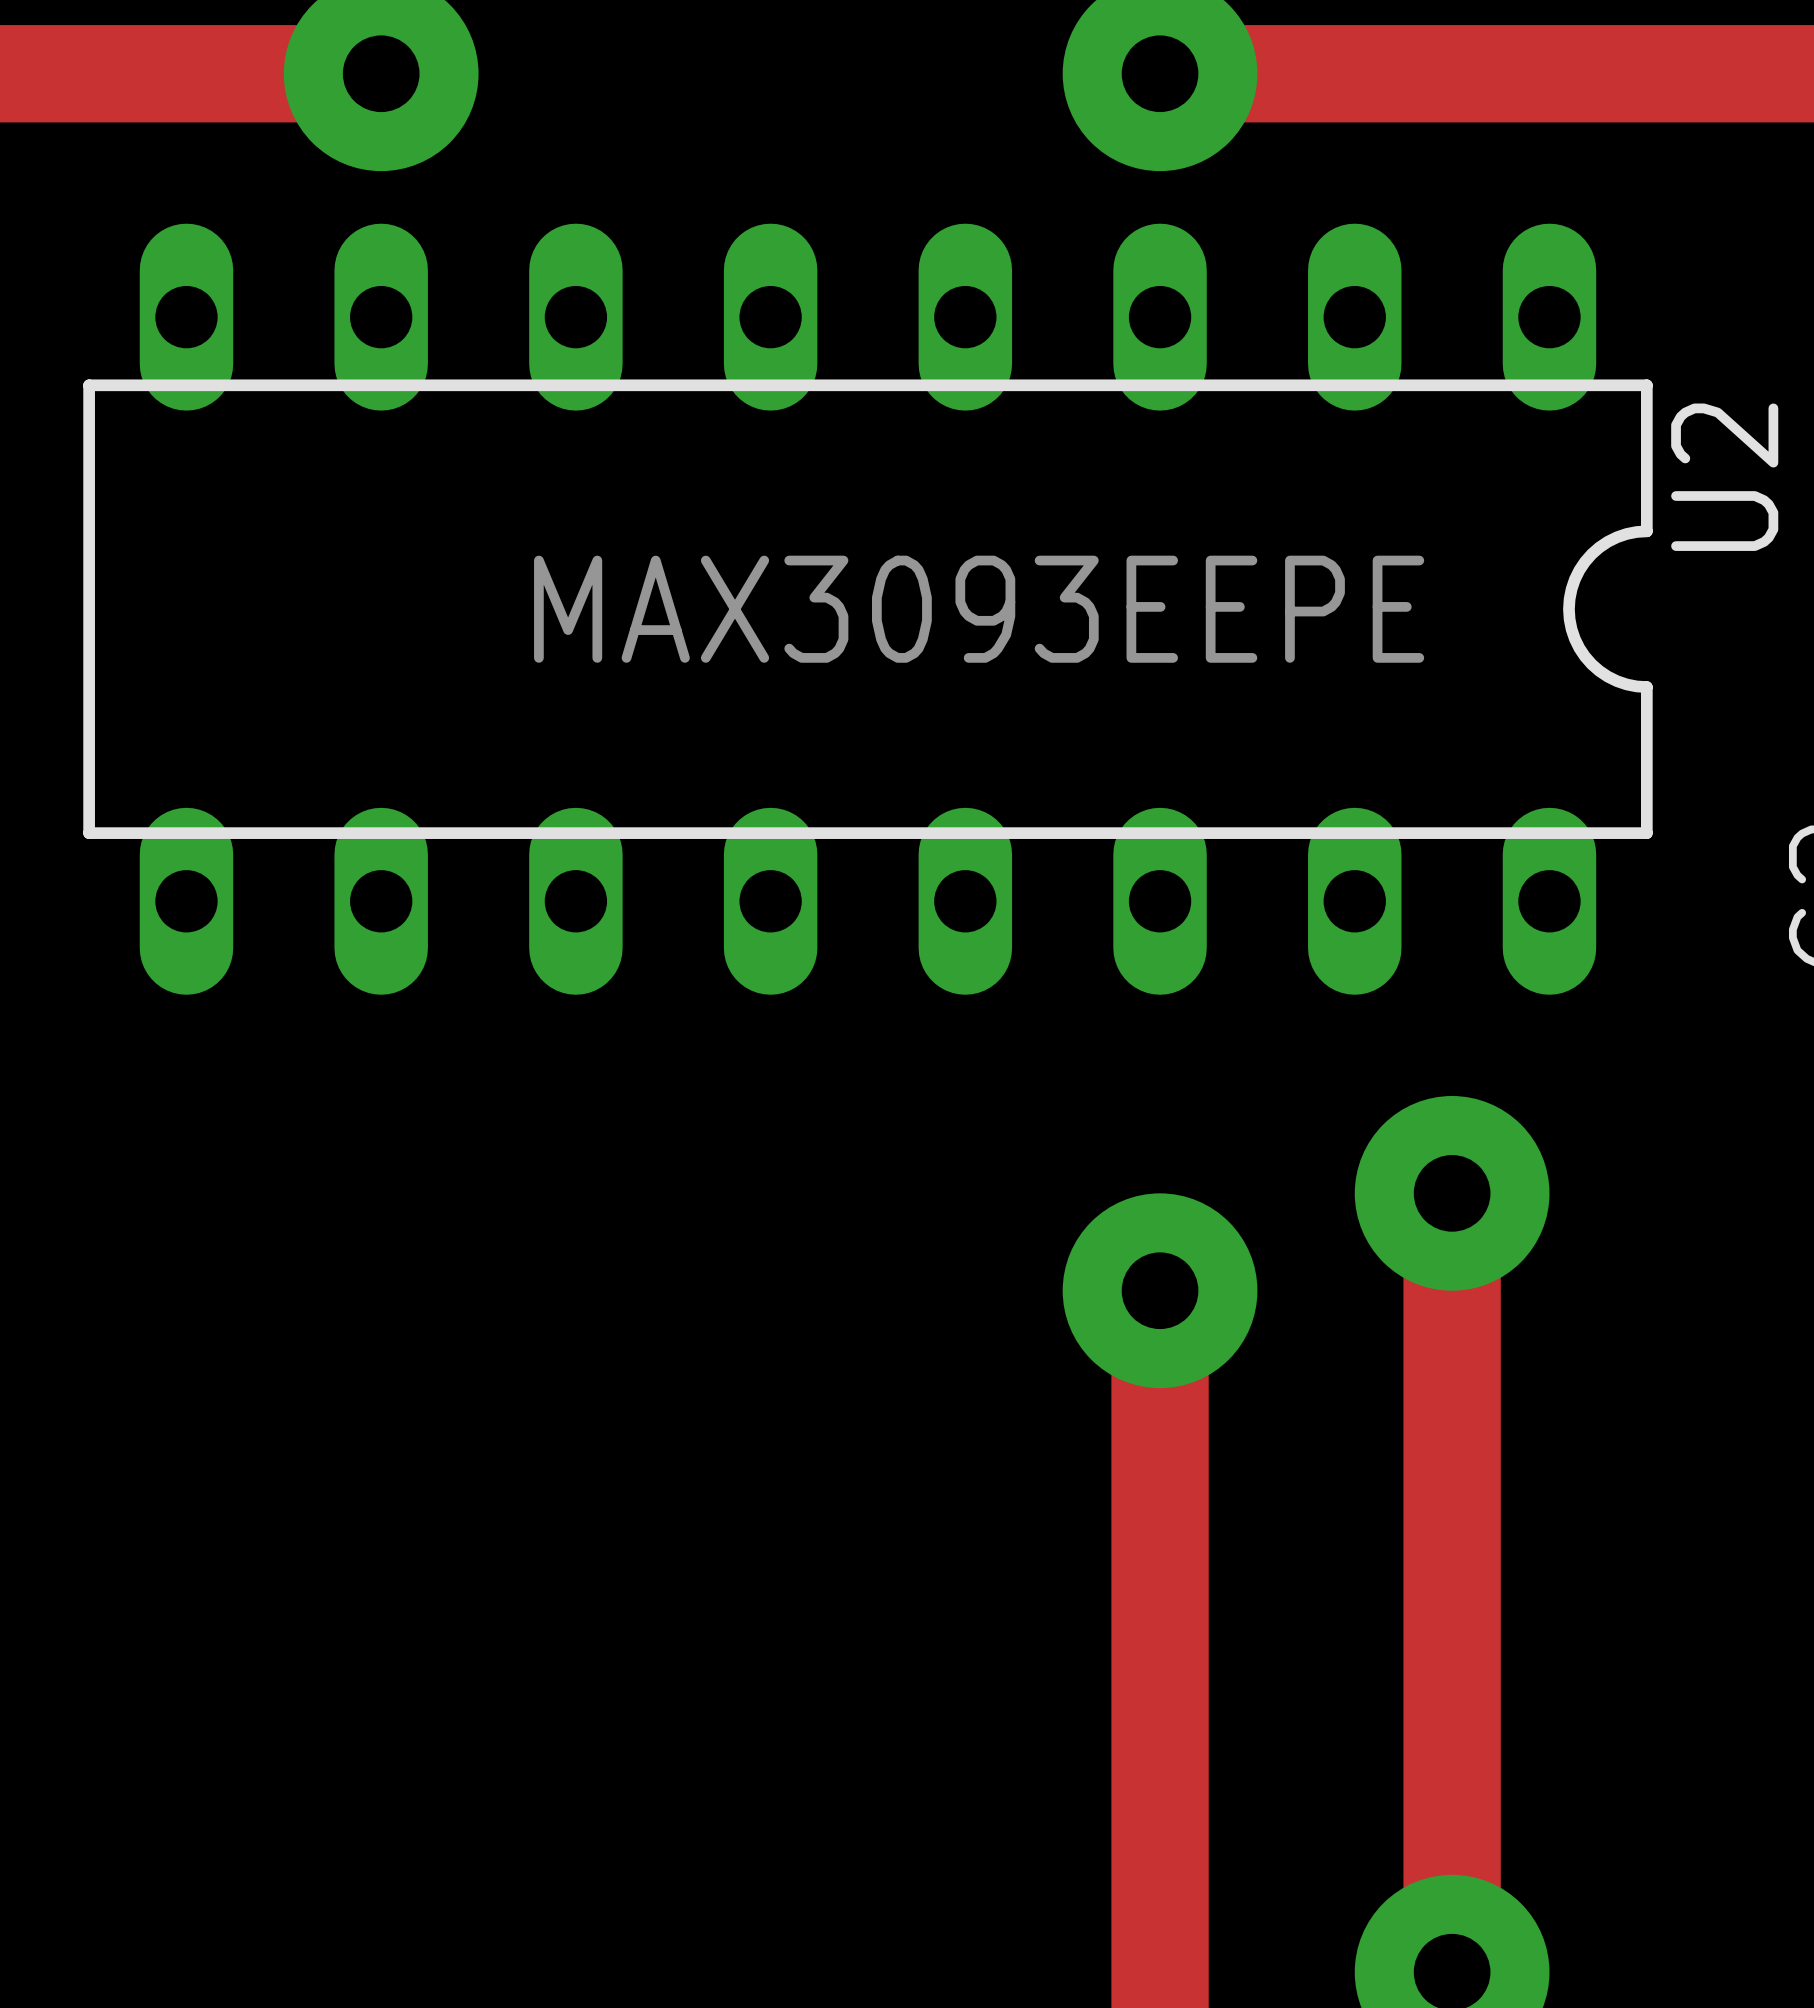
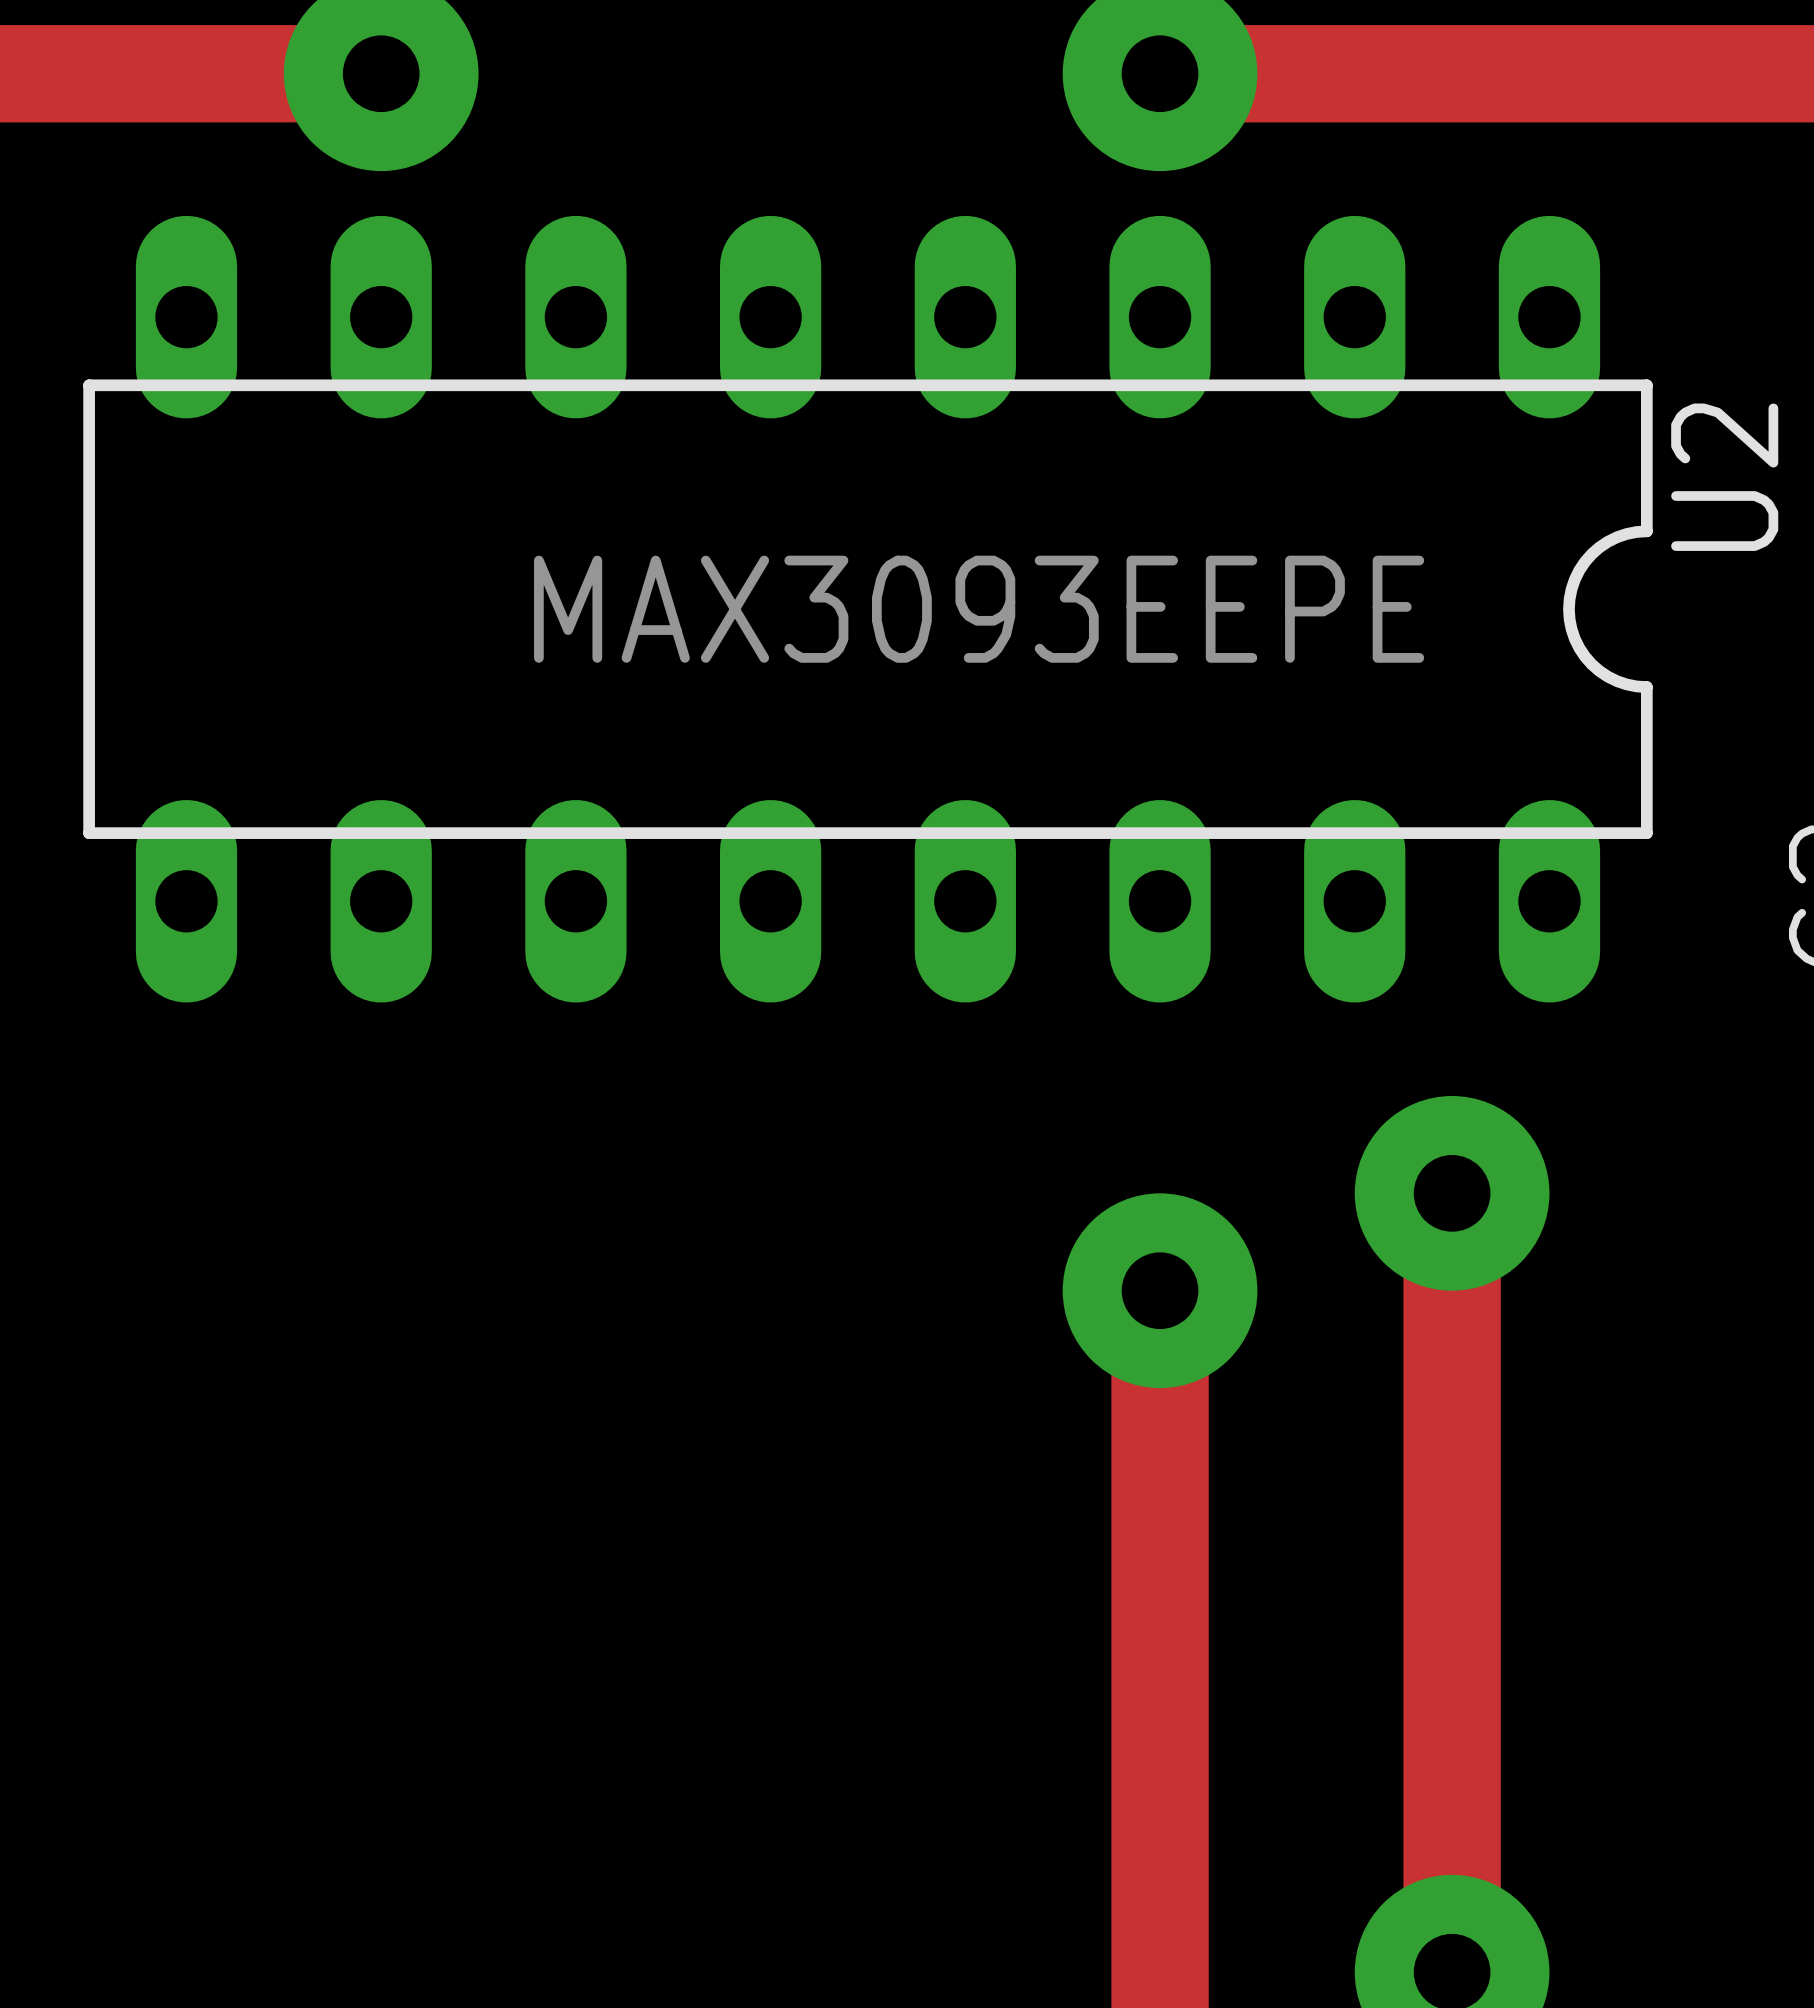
U2 footprint: [83, 223, 1653, 995] -> [83, 215, 1653, 1003]

